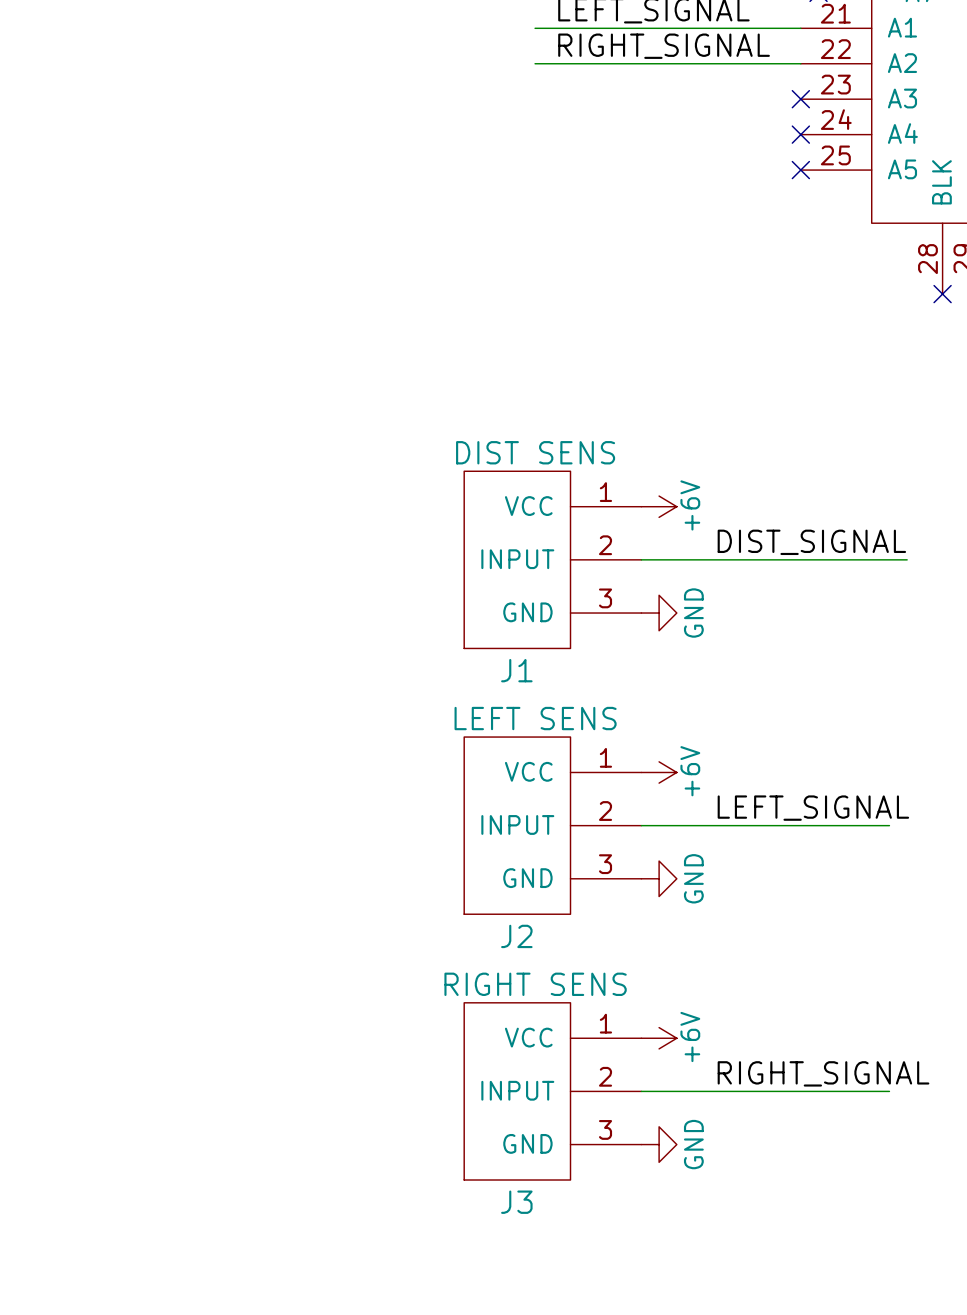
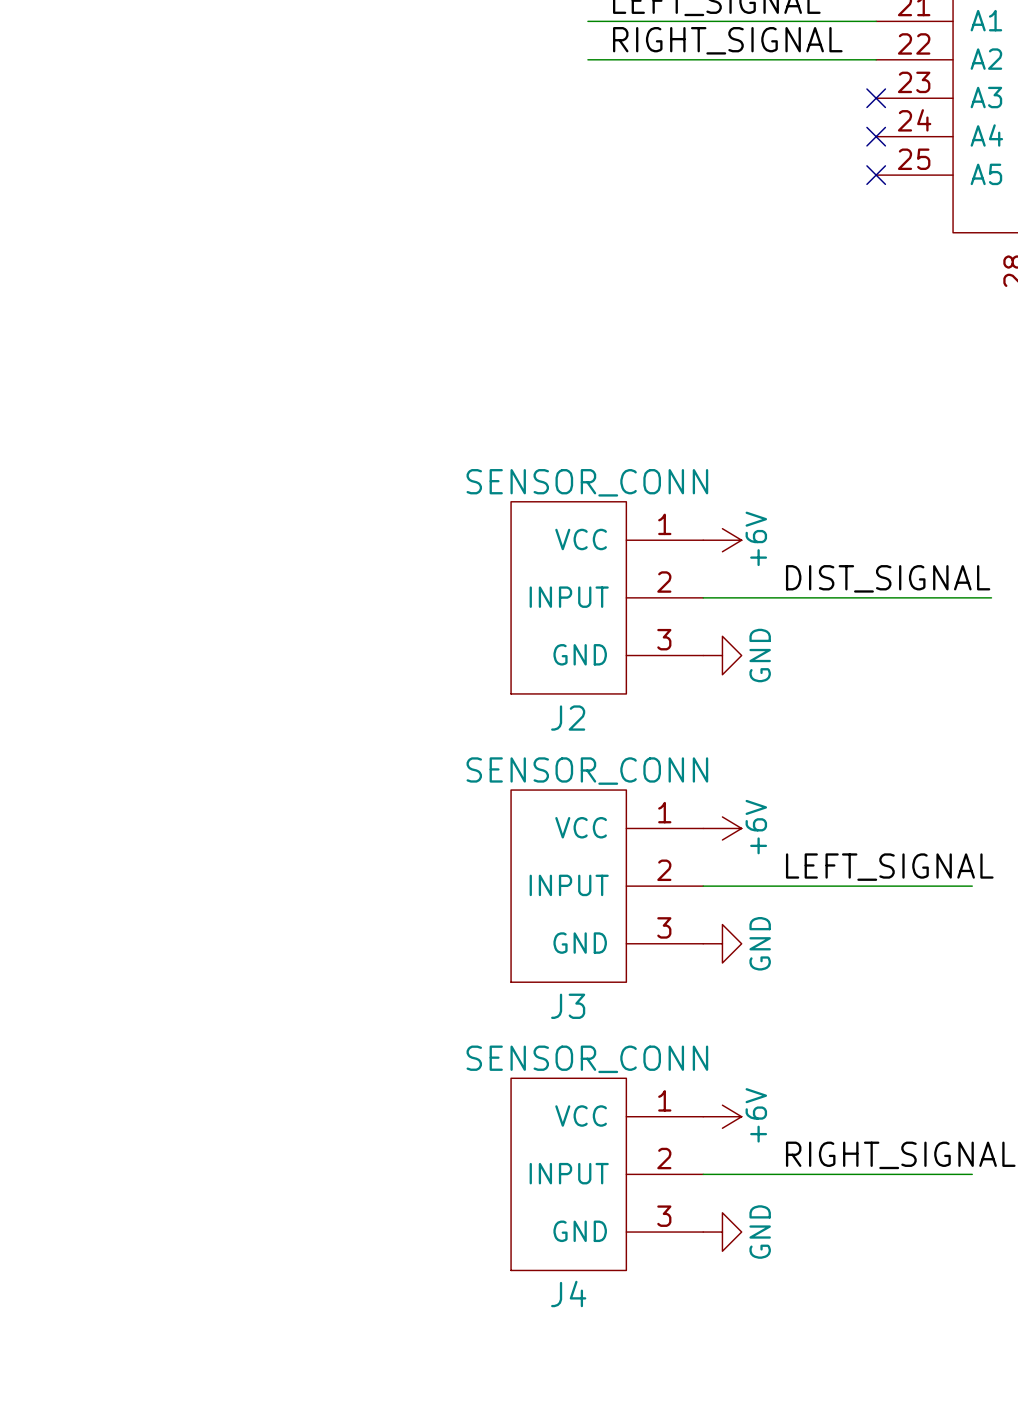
J1 value: DIST SENS (535, 452) -> SENSOR_CONN (587, 482)
J1 name: J1 (516, 670) -> J2 (568, 718)
J2 value: LEFT SENS (535, 718) -> SENSOR_CONN (587, 771)
J2 name: J2 (516, 936) -> J3 (568, 1006)
J3 value: RIGHT SENS (535, 984) -> SENSOR_CONN (587, 1059)
J3 name: J3 (516, 1202) -> J4 (568, 1293)

